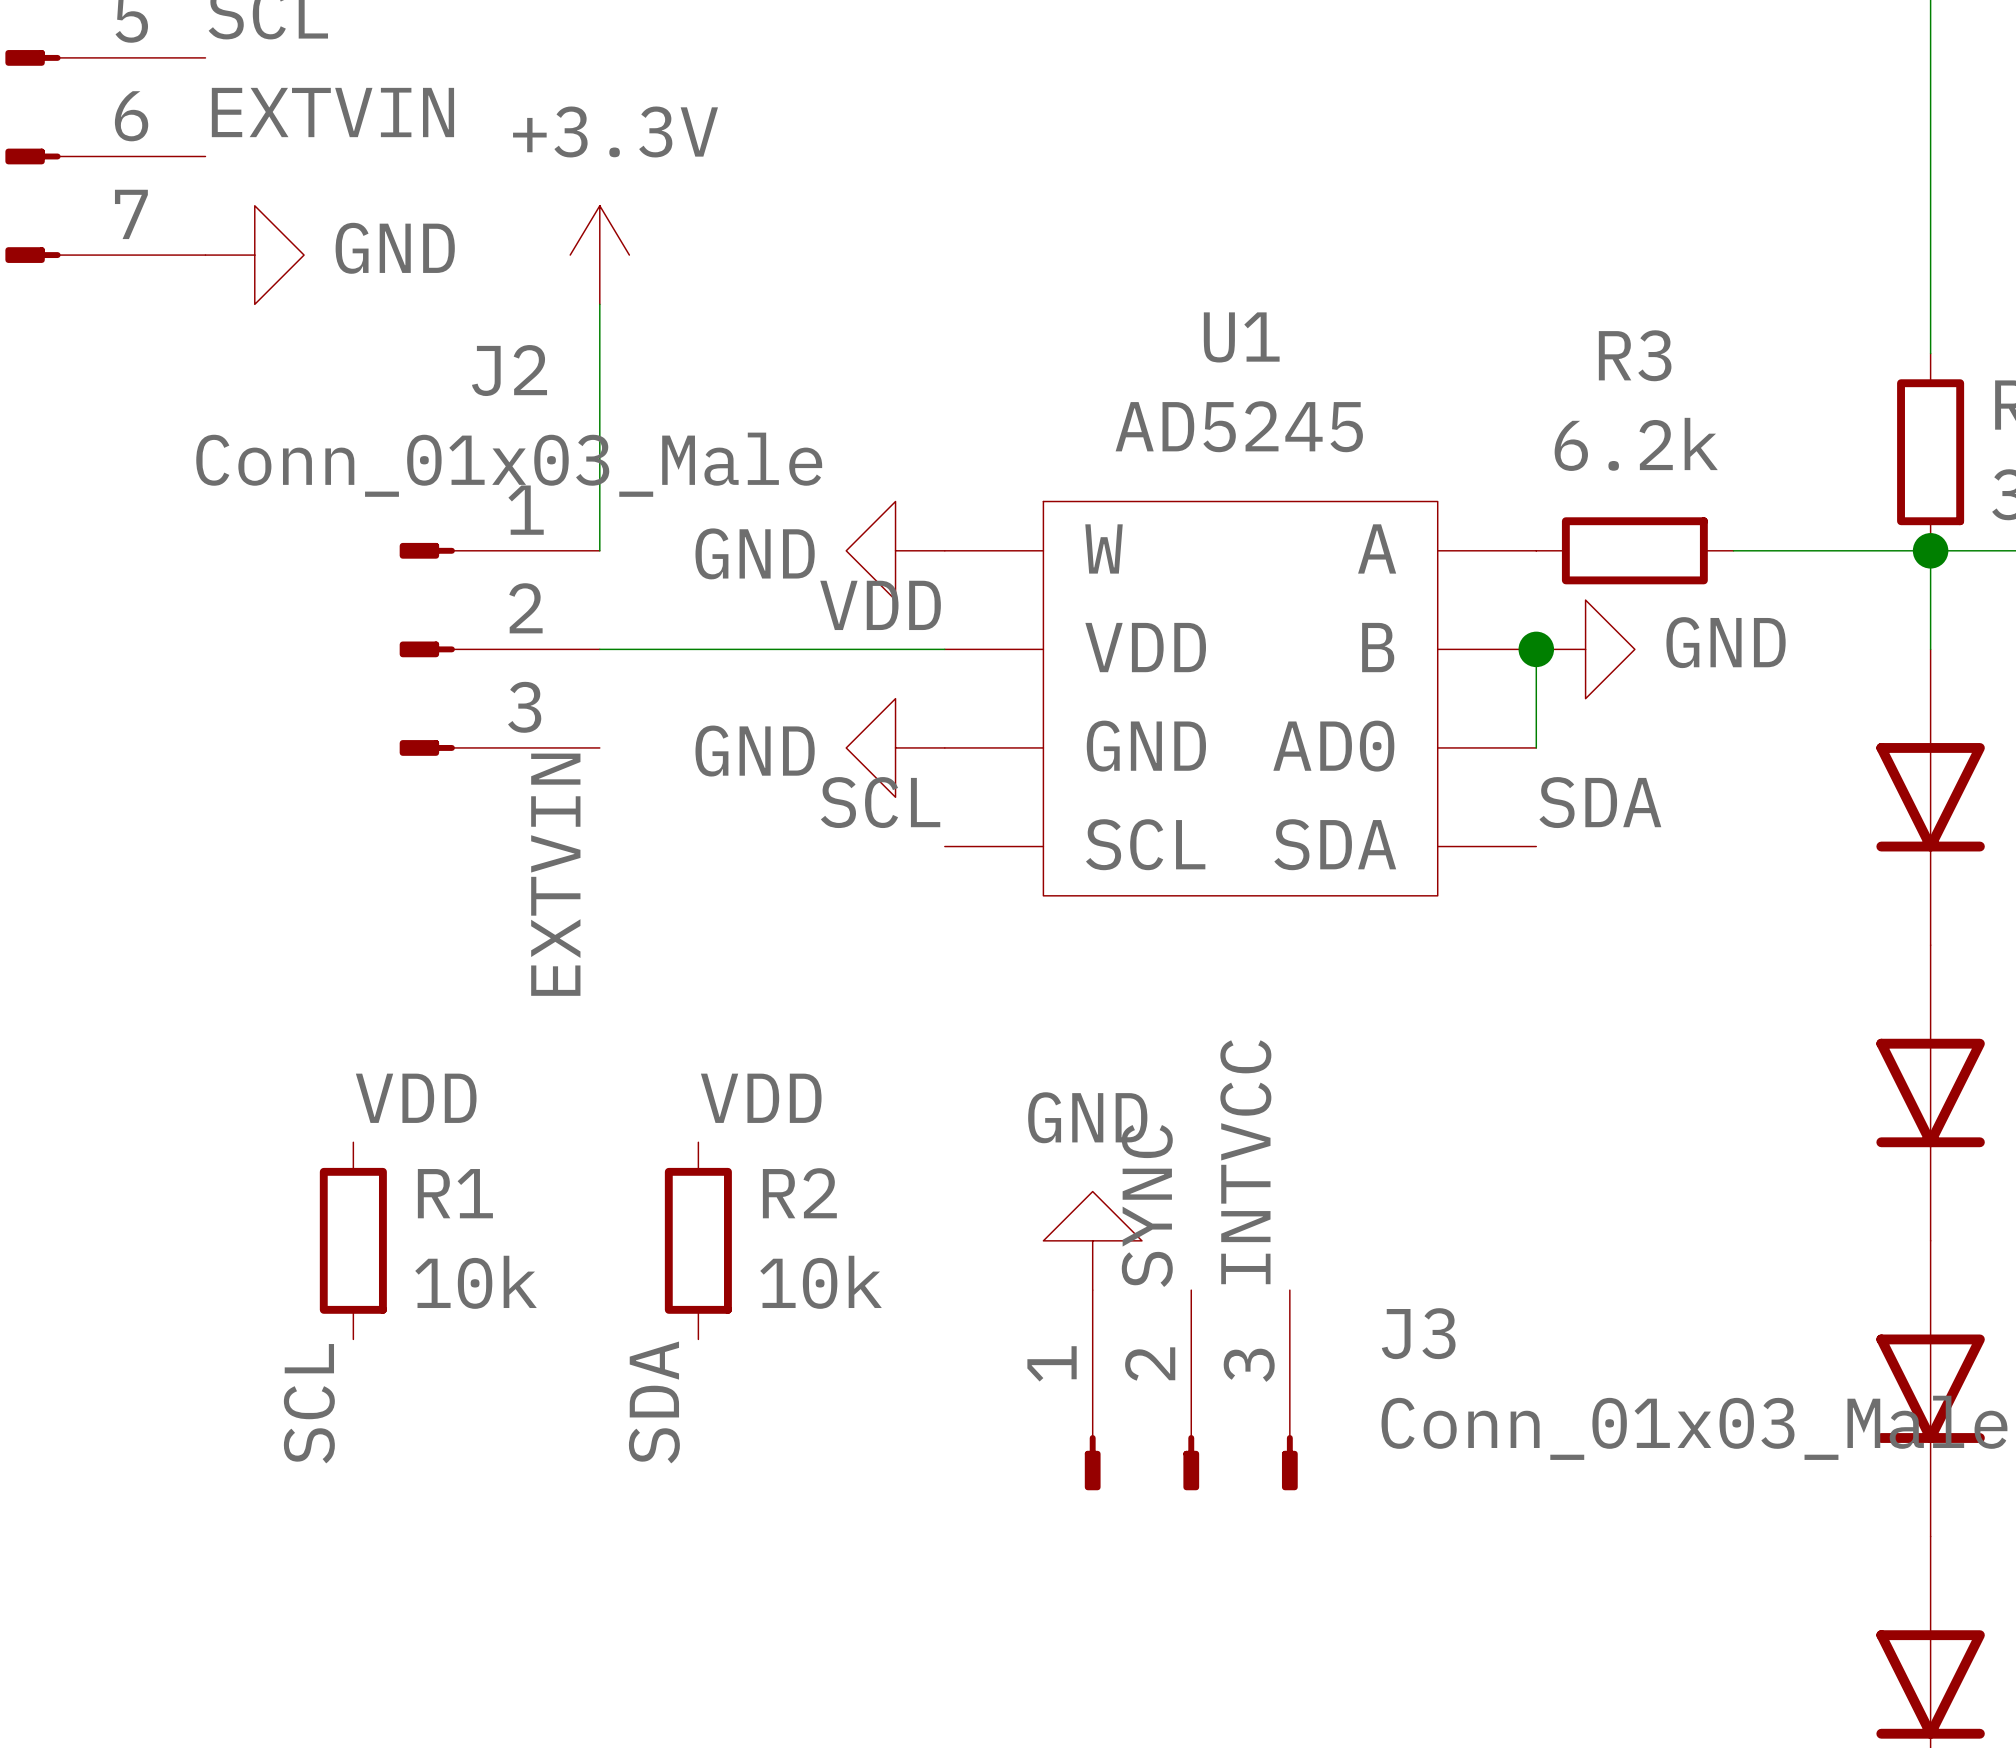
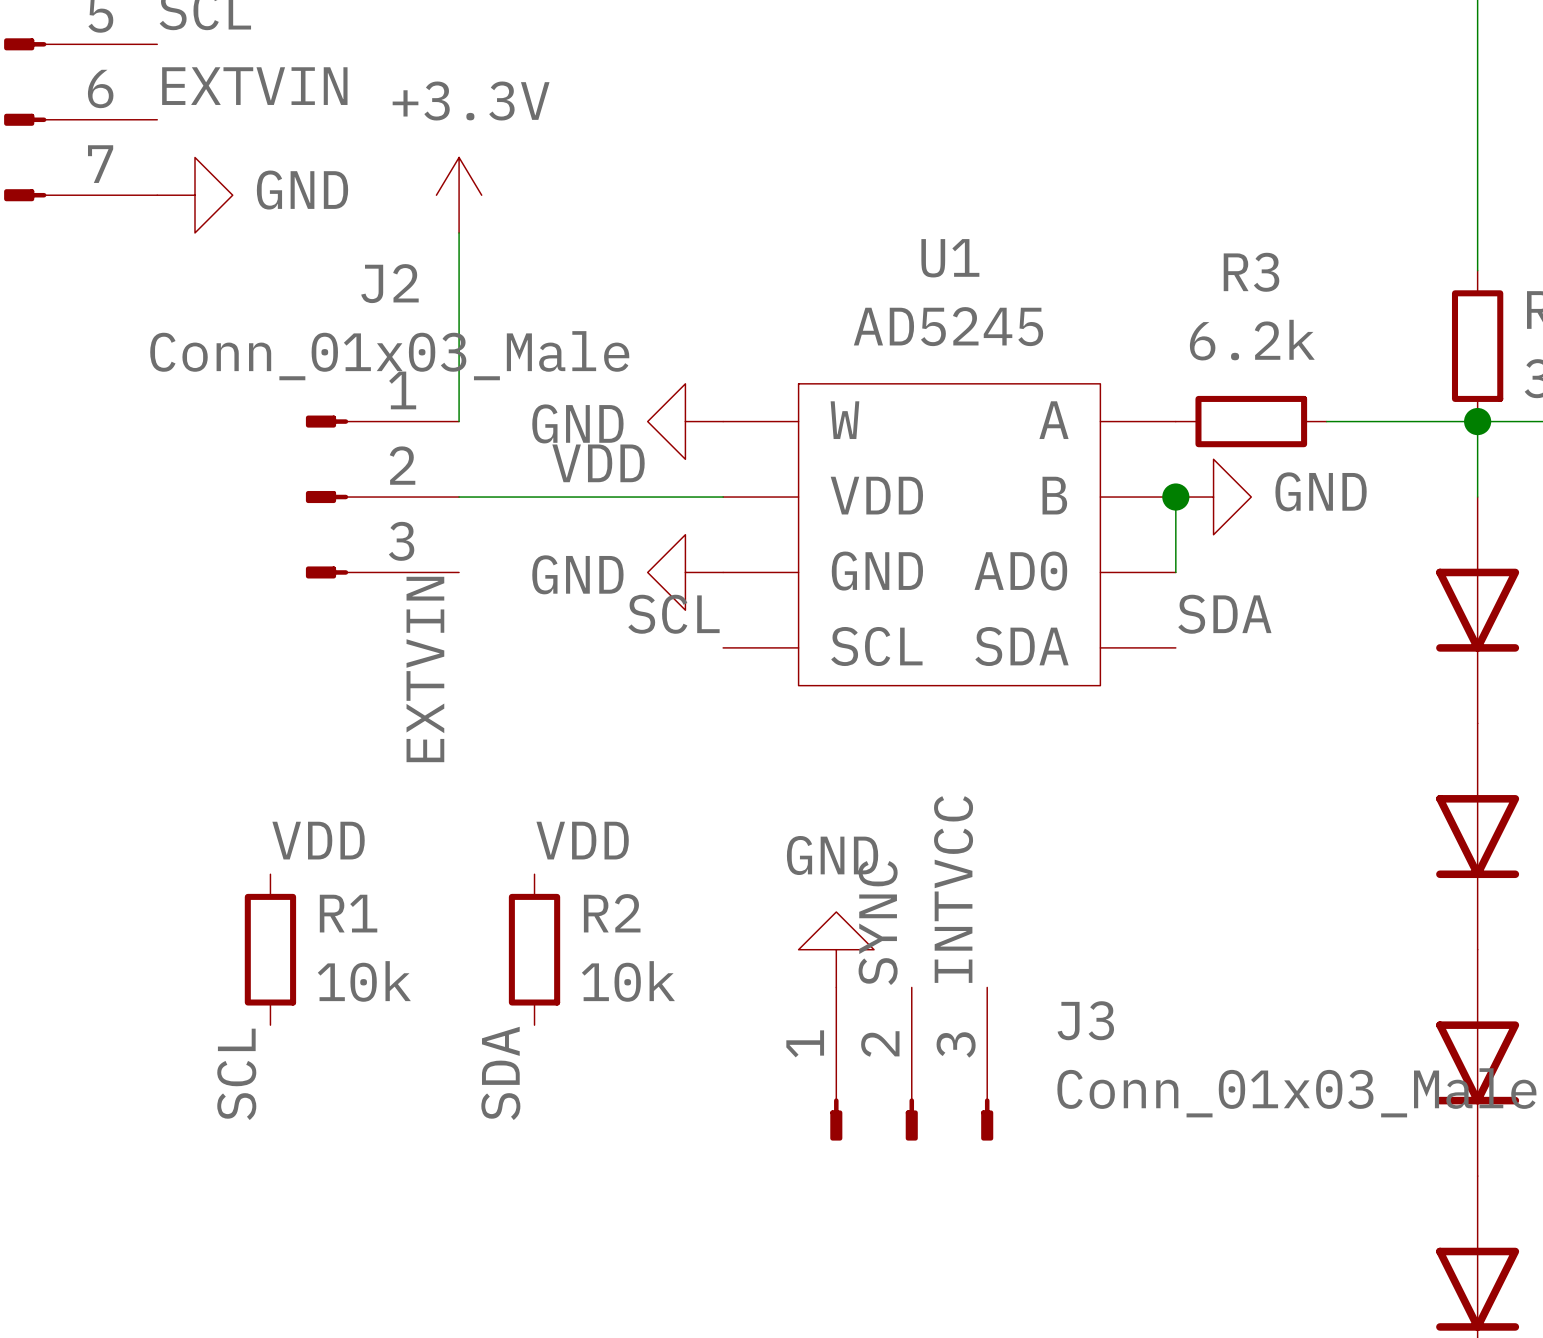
label position: VDD (880, 605) -> VDD (598, 463)

